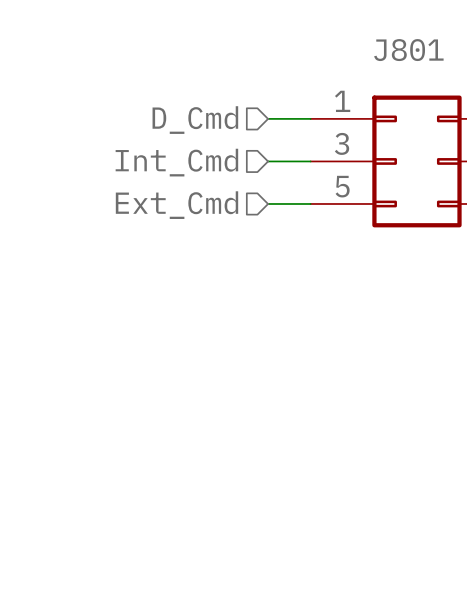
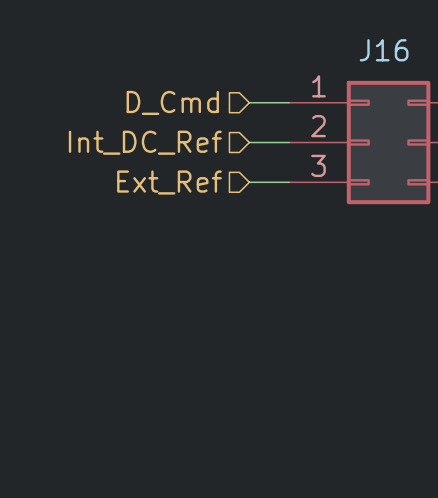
J801 name: J801 (408, 50) -> J16 (384, 50)
J801 pin number: 3 (342, 143) -> 2 (318, 126)
hierarchical label: Int_Cmd (176, 162) -> Int_DC_Ref (145, 142)
J801 pin number: 5 (342, 186) -> 3 (318, 165)
hierarchical label: Ext_Cmd (176, 205) -> Ext_Ref (169, 182)

